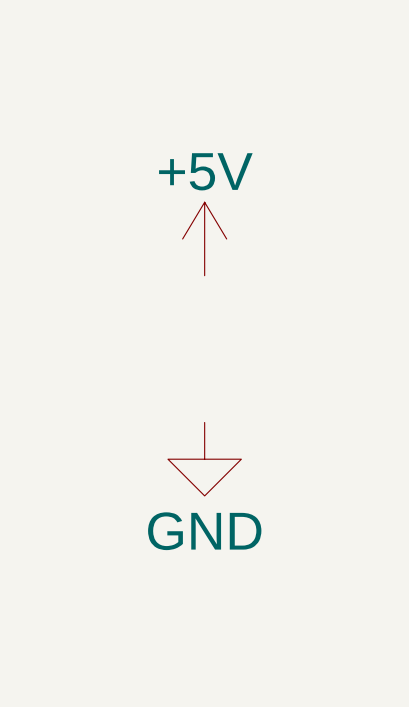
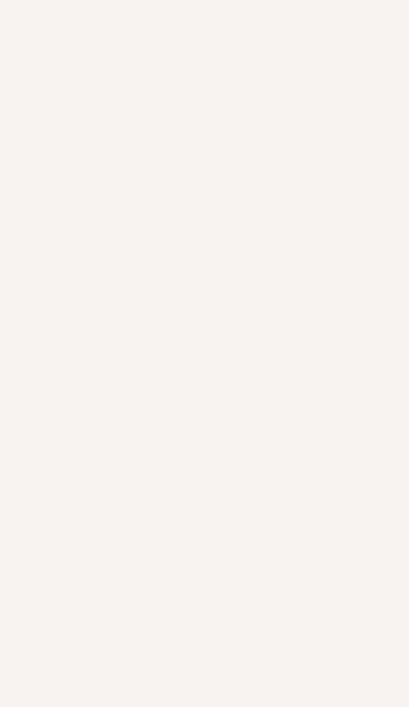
power symbol: +5V (204, 238) -> none
power symbol: GND (204, 459) -> none

